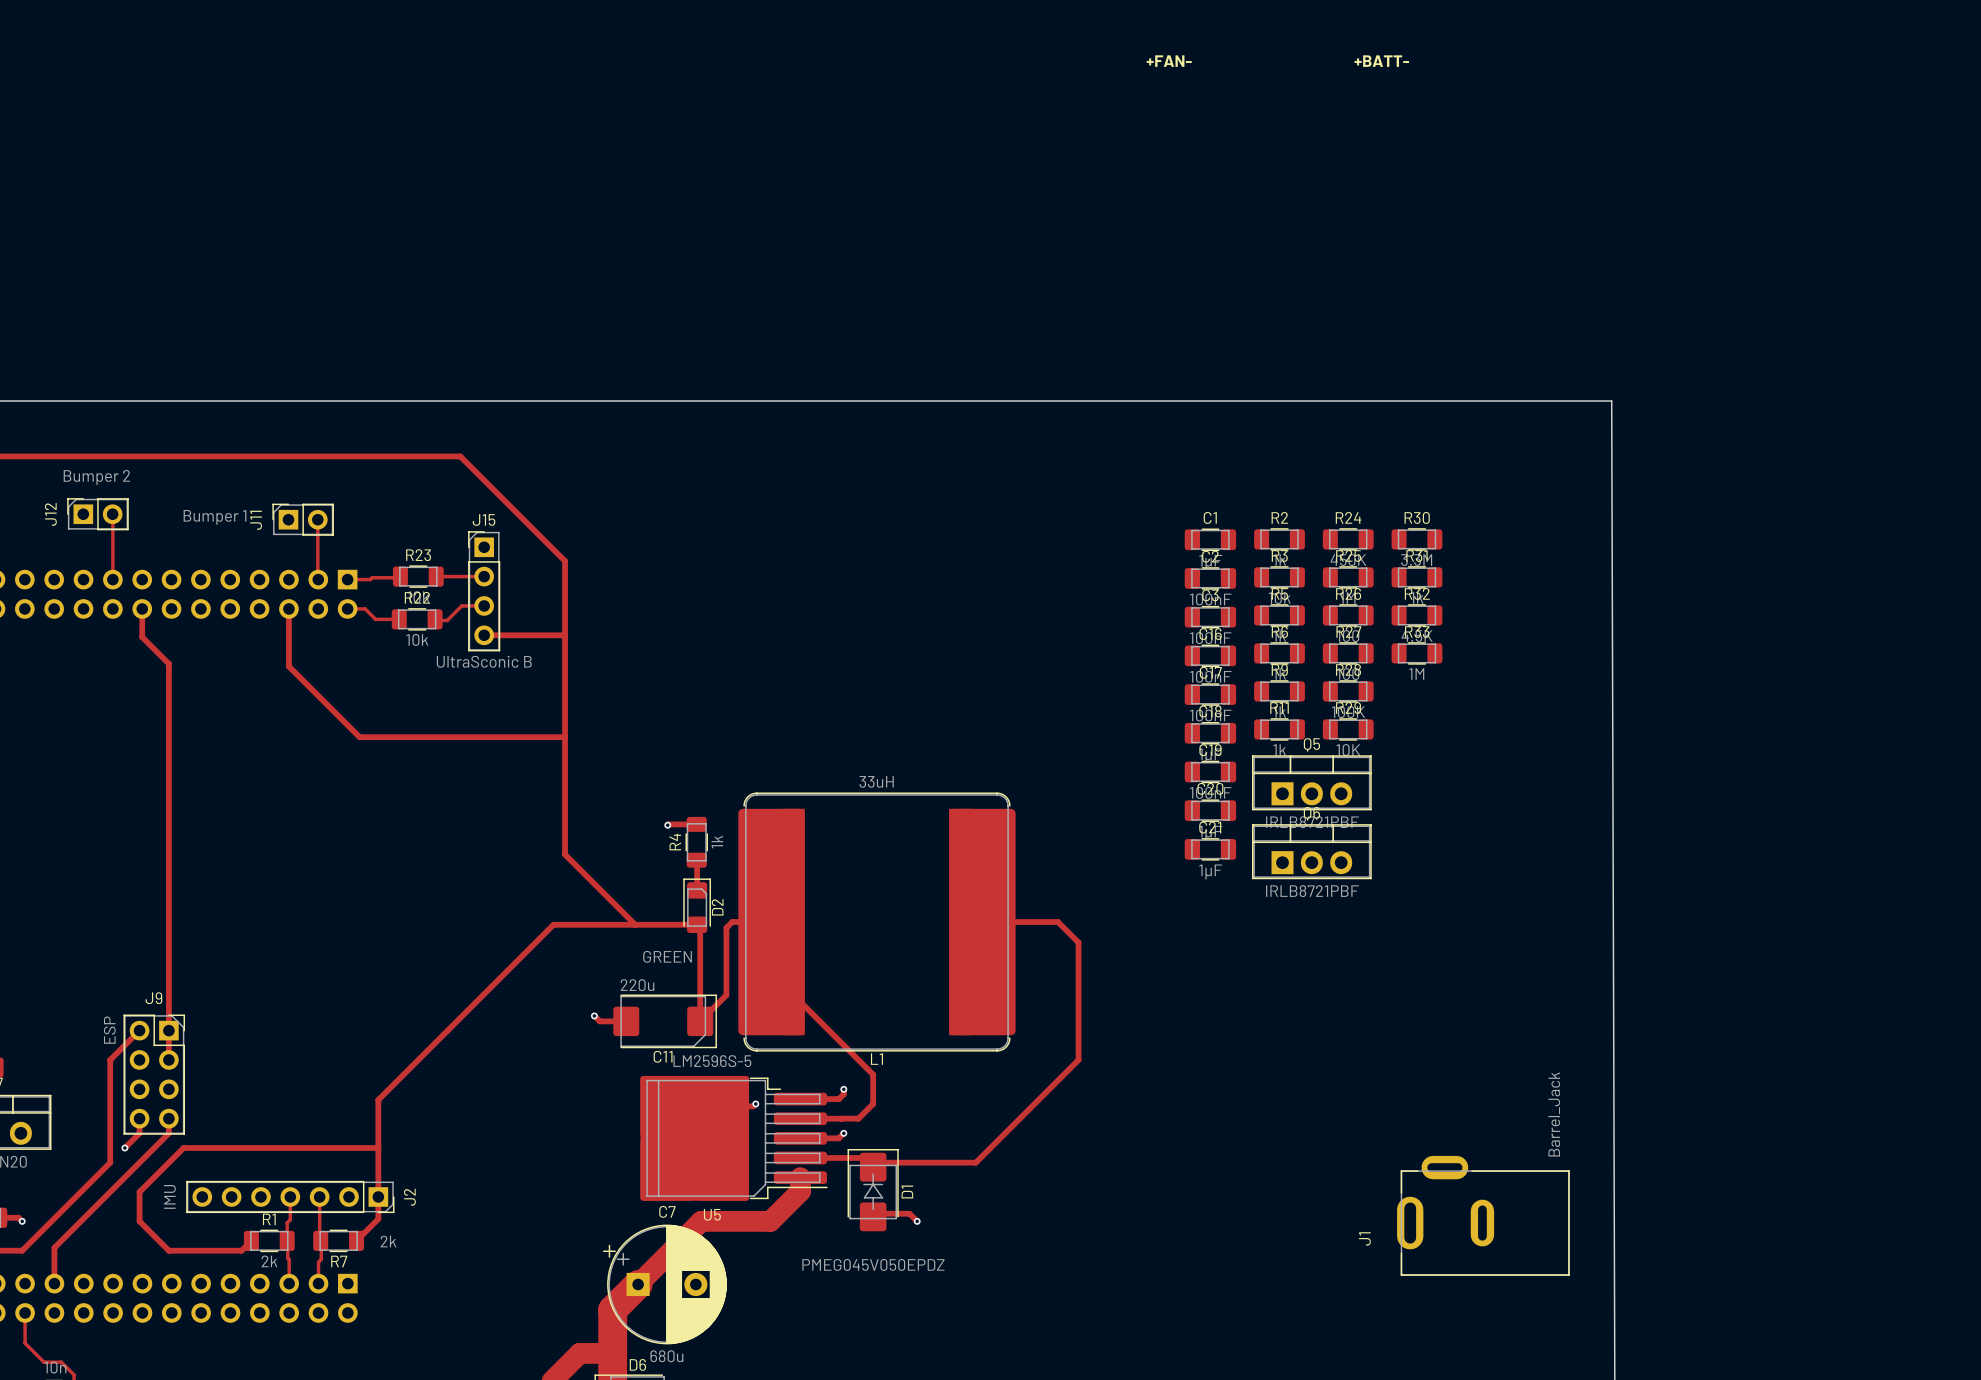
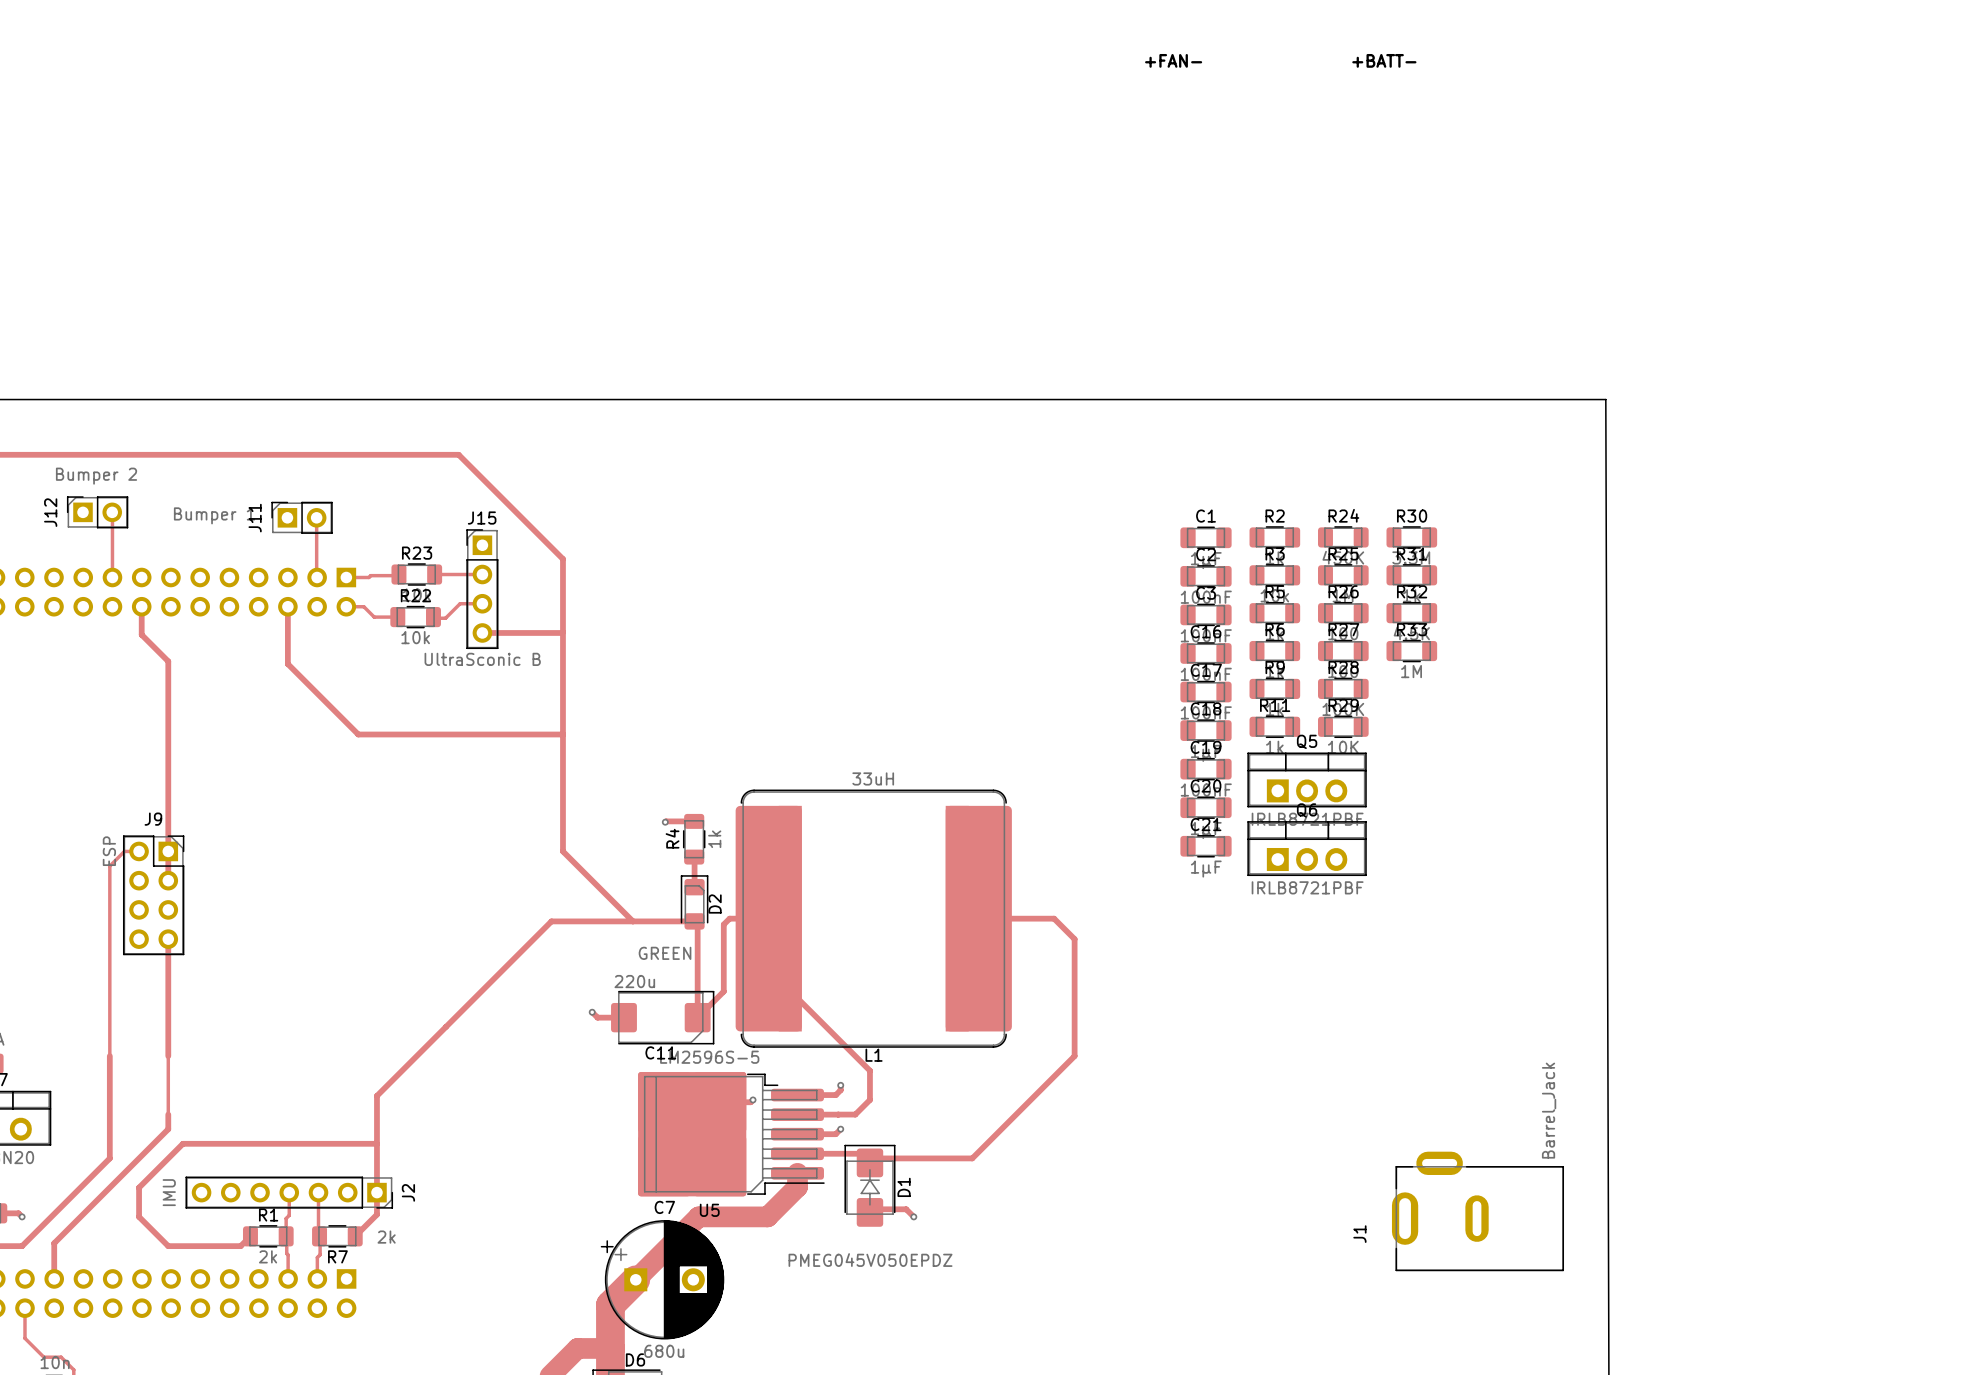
track: (168, 883) (168, 942) -> (168, 1056) (168, 1114)
track: (139, 1030) (110, 1059) -> (139, 851) (124, 851) (109, 866) (109, 1056)
J9 position: (154, 1074) -> (153, 895)
track: (139, 1118) (139, 1133) (124, 1148) -> none
via: (124, 1148) -> none

